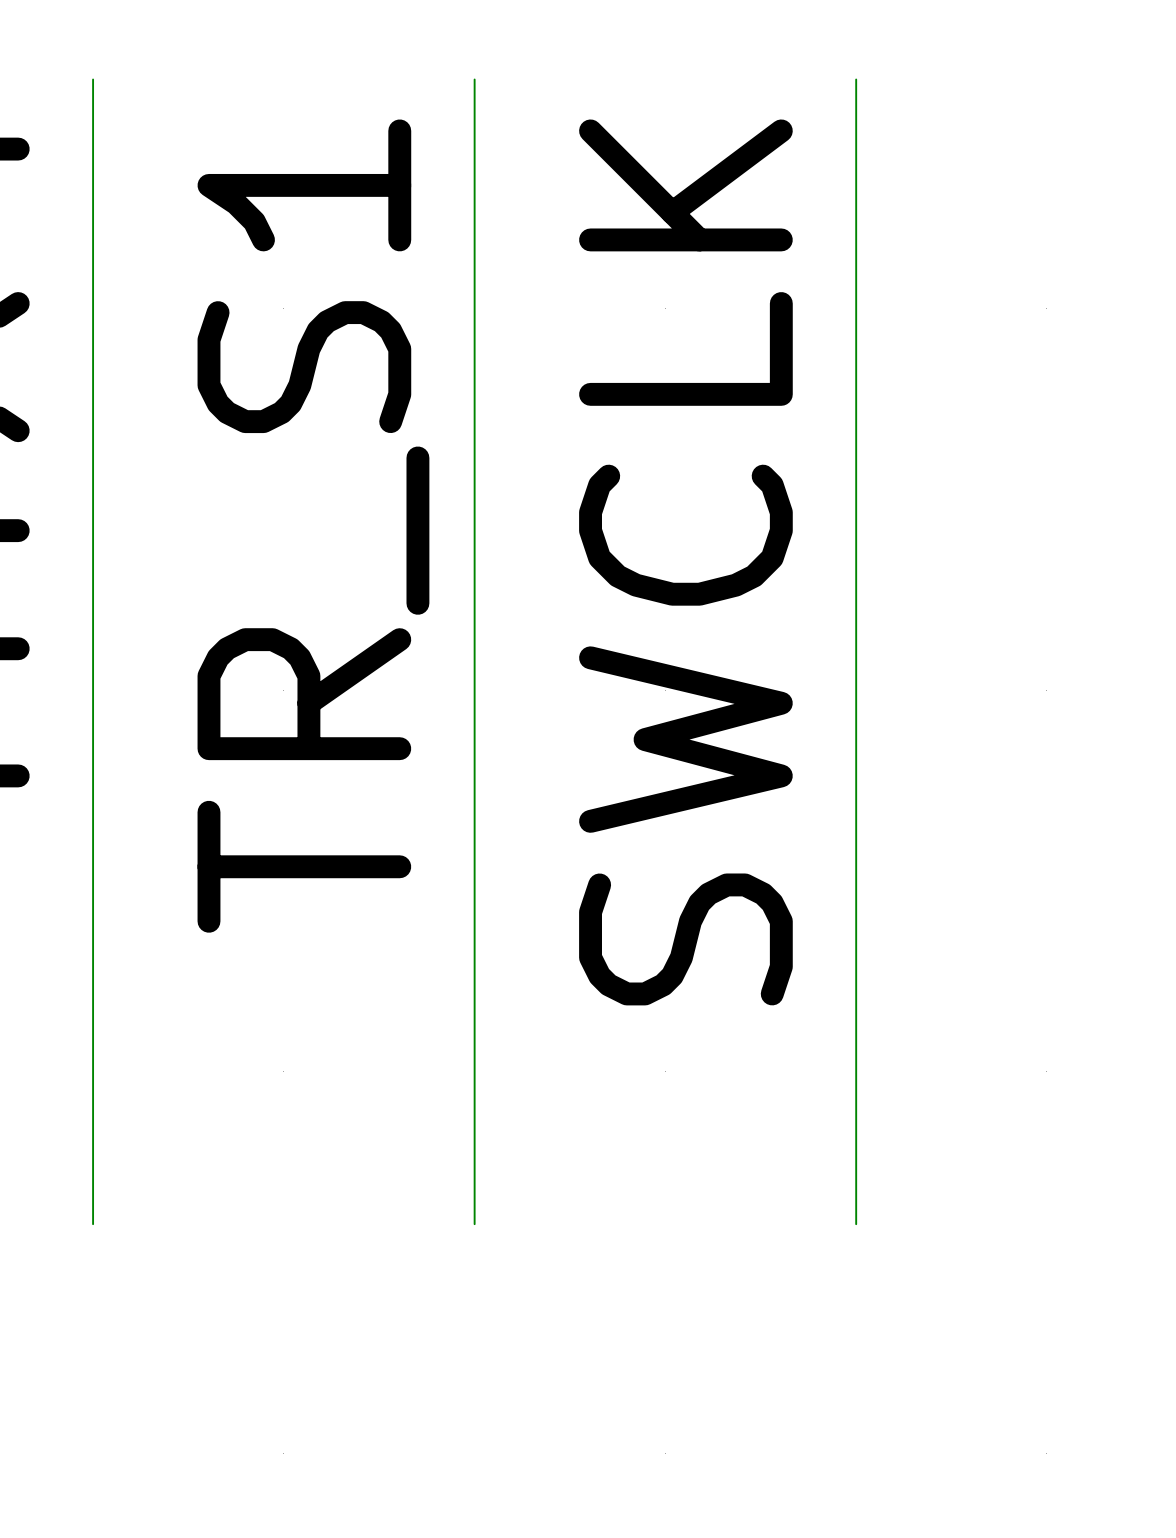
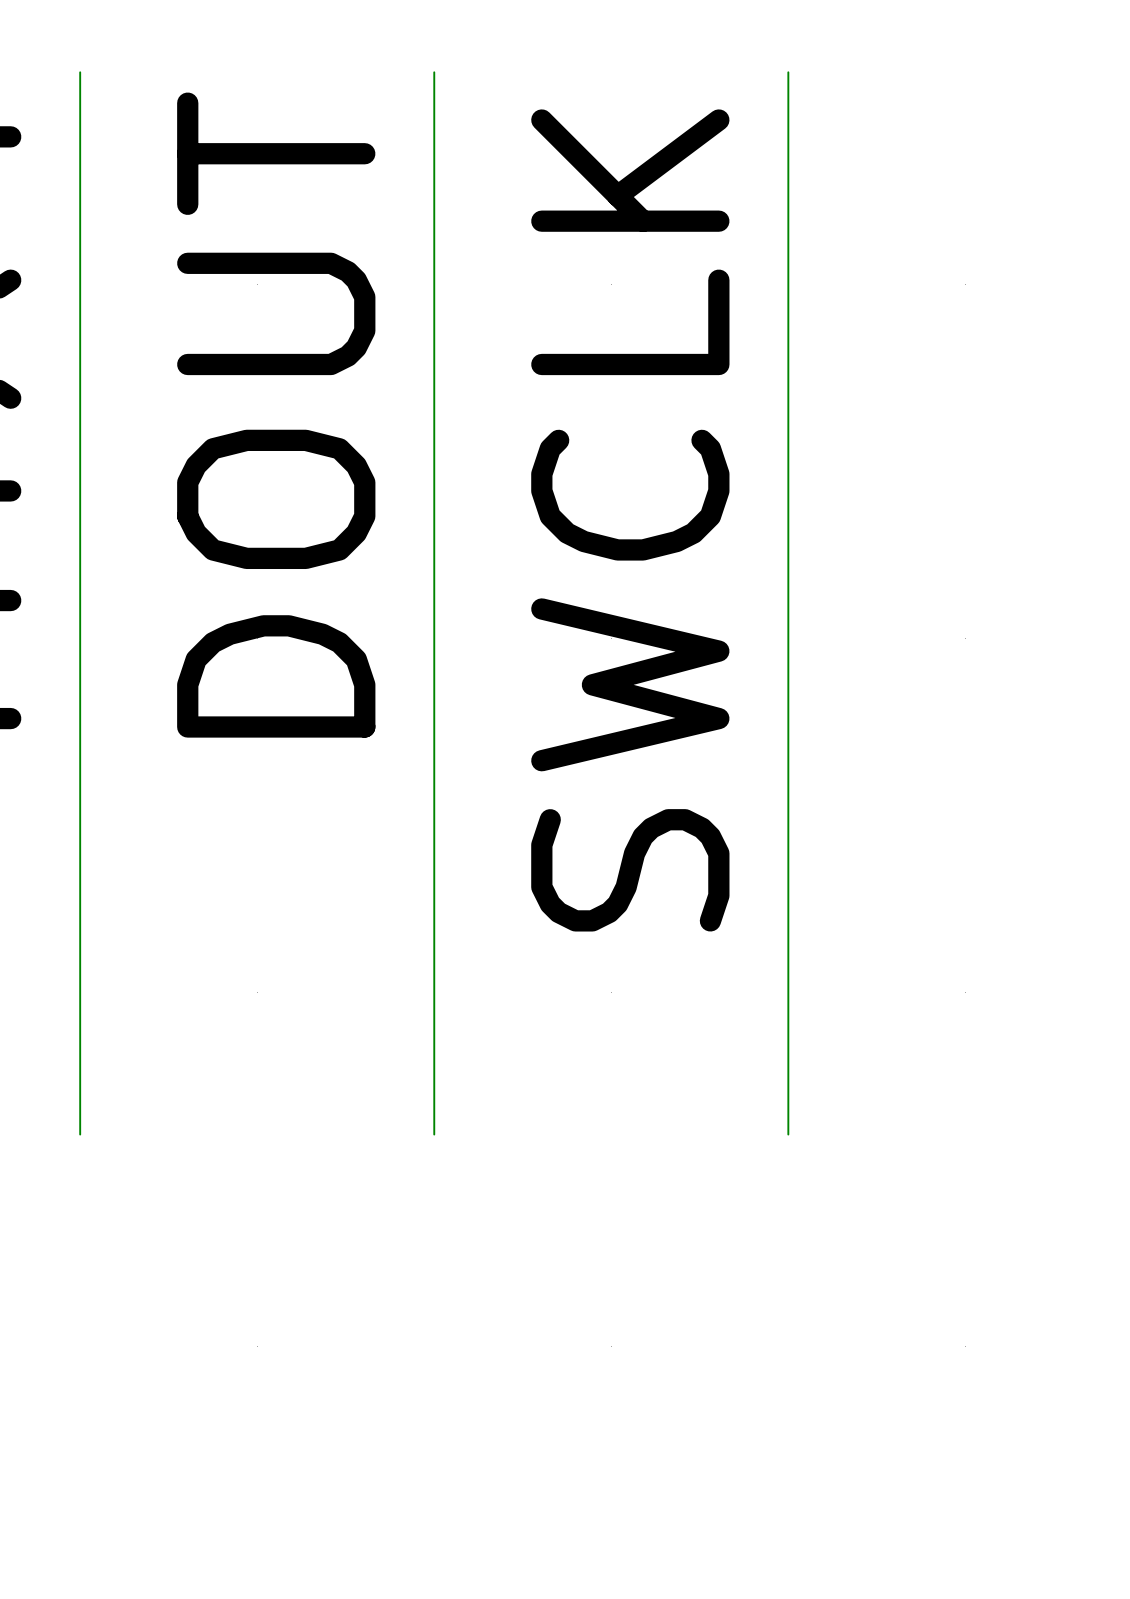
label: TR_S1 (313, 526) -> DOUT (276, 415)

